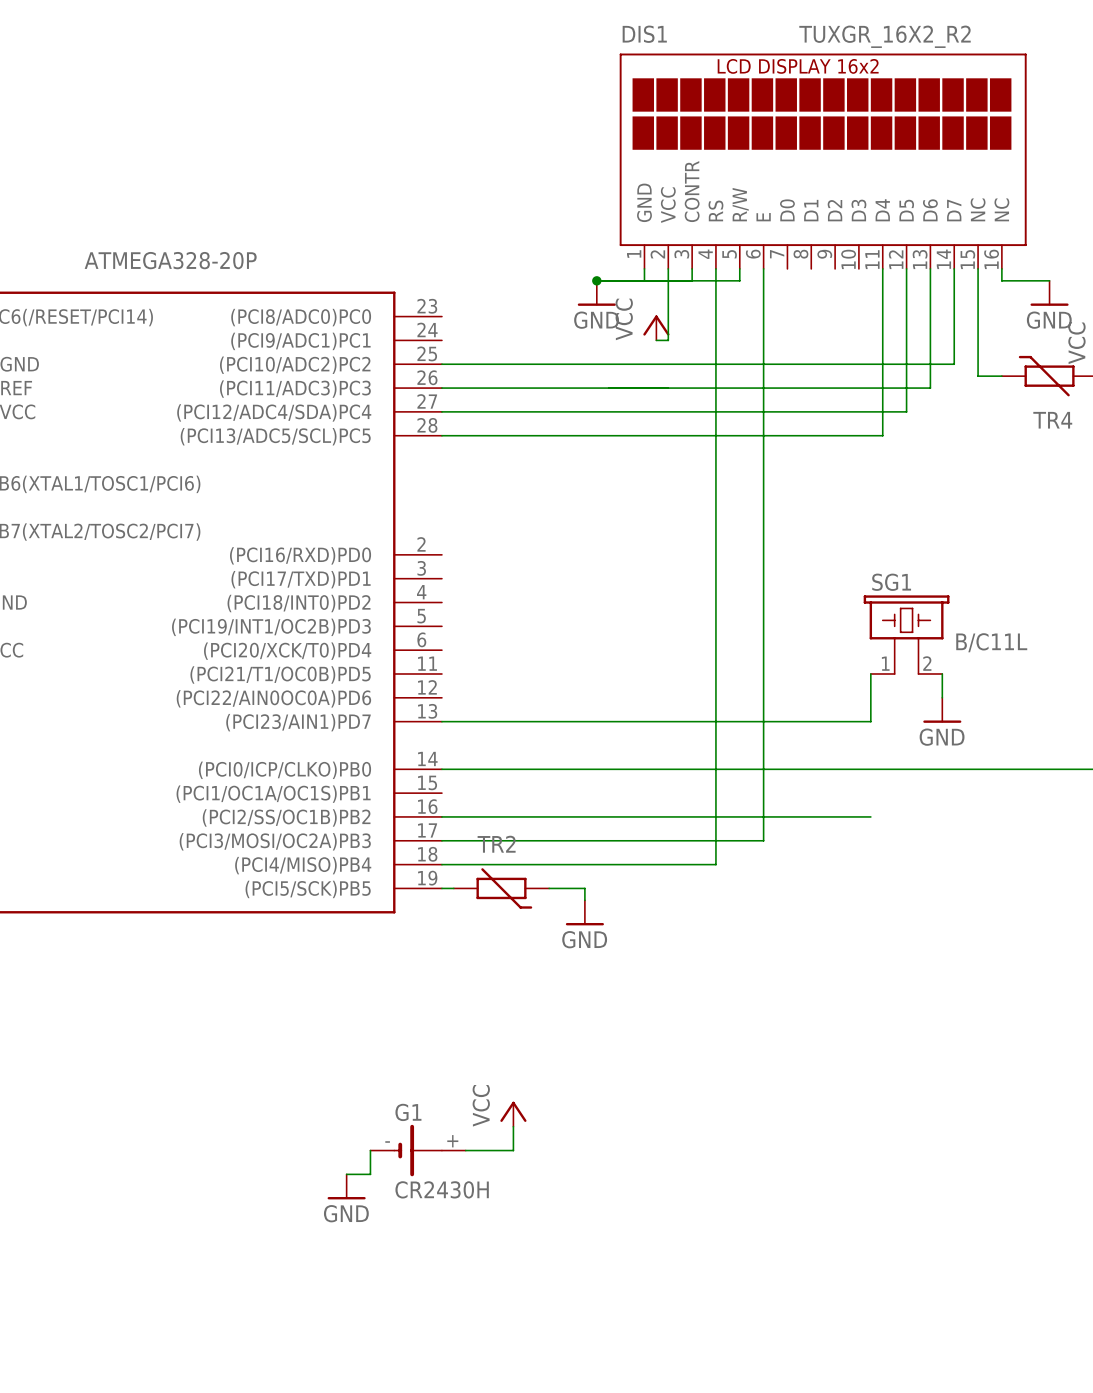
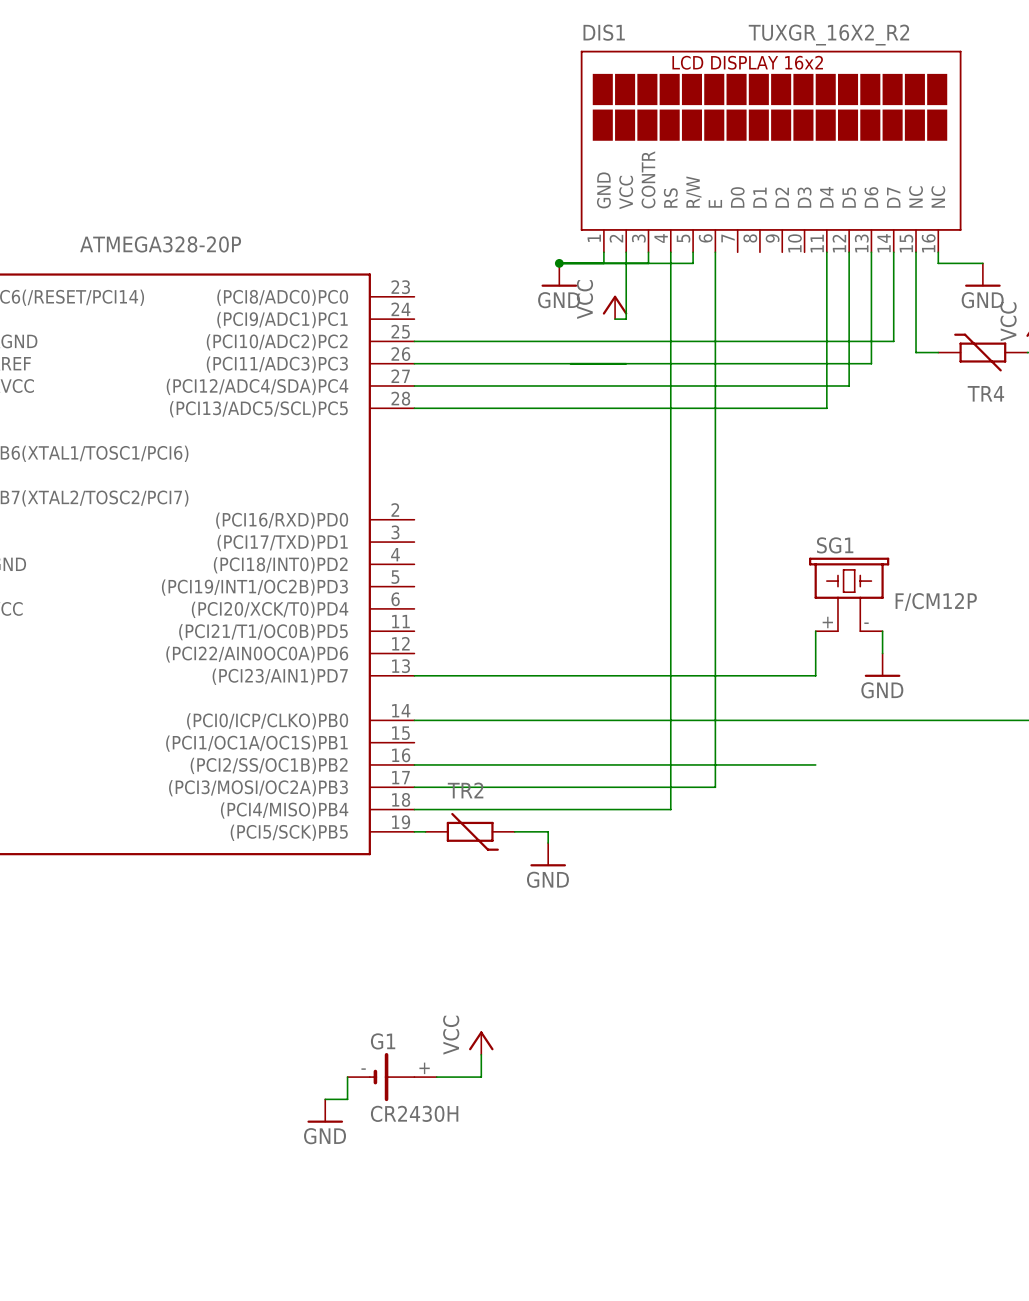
SG1 value: B/C11L (991, 642) -> F/CM12P (936, 601)
SG1 pin number: 1 (885, 663) -> + (827, 622)
SG1 pin number: 2 (927, 663) -> - (866, 623)

